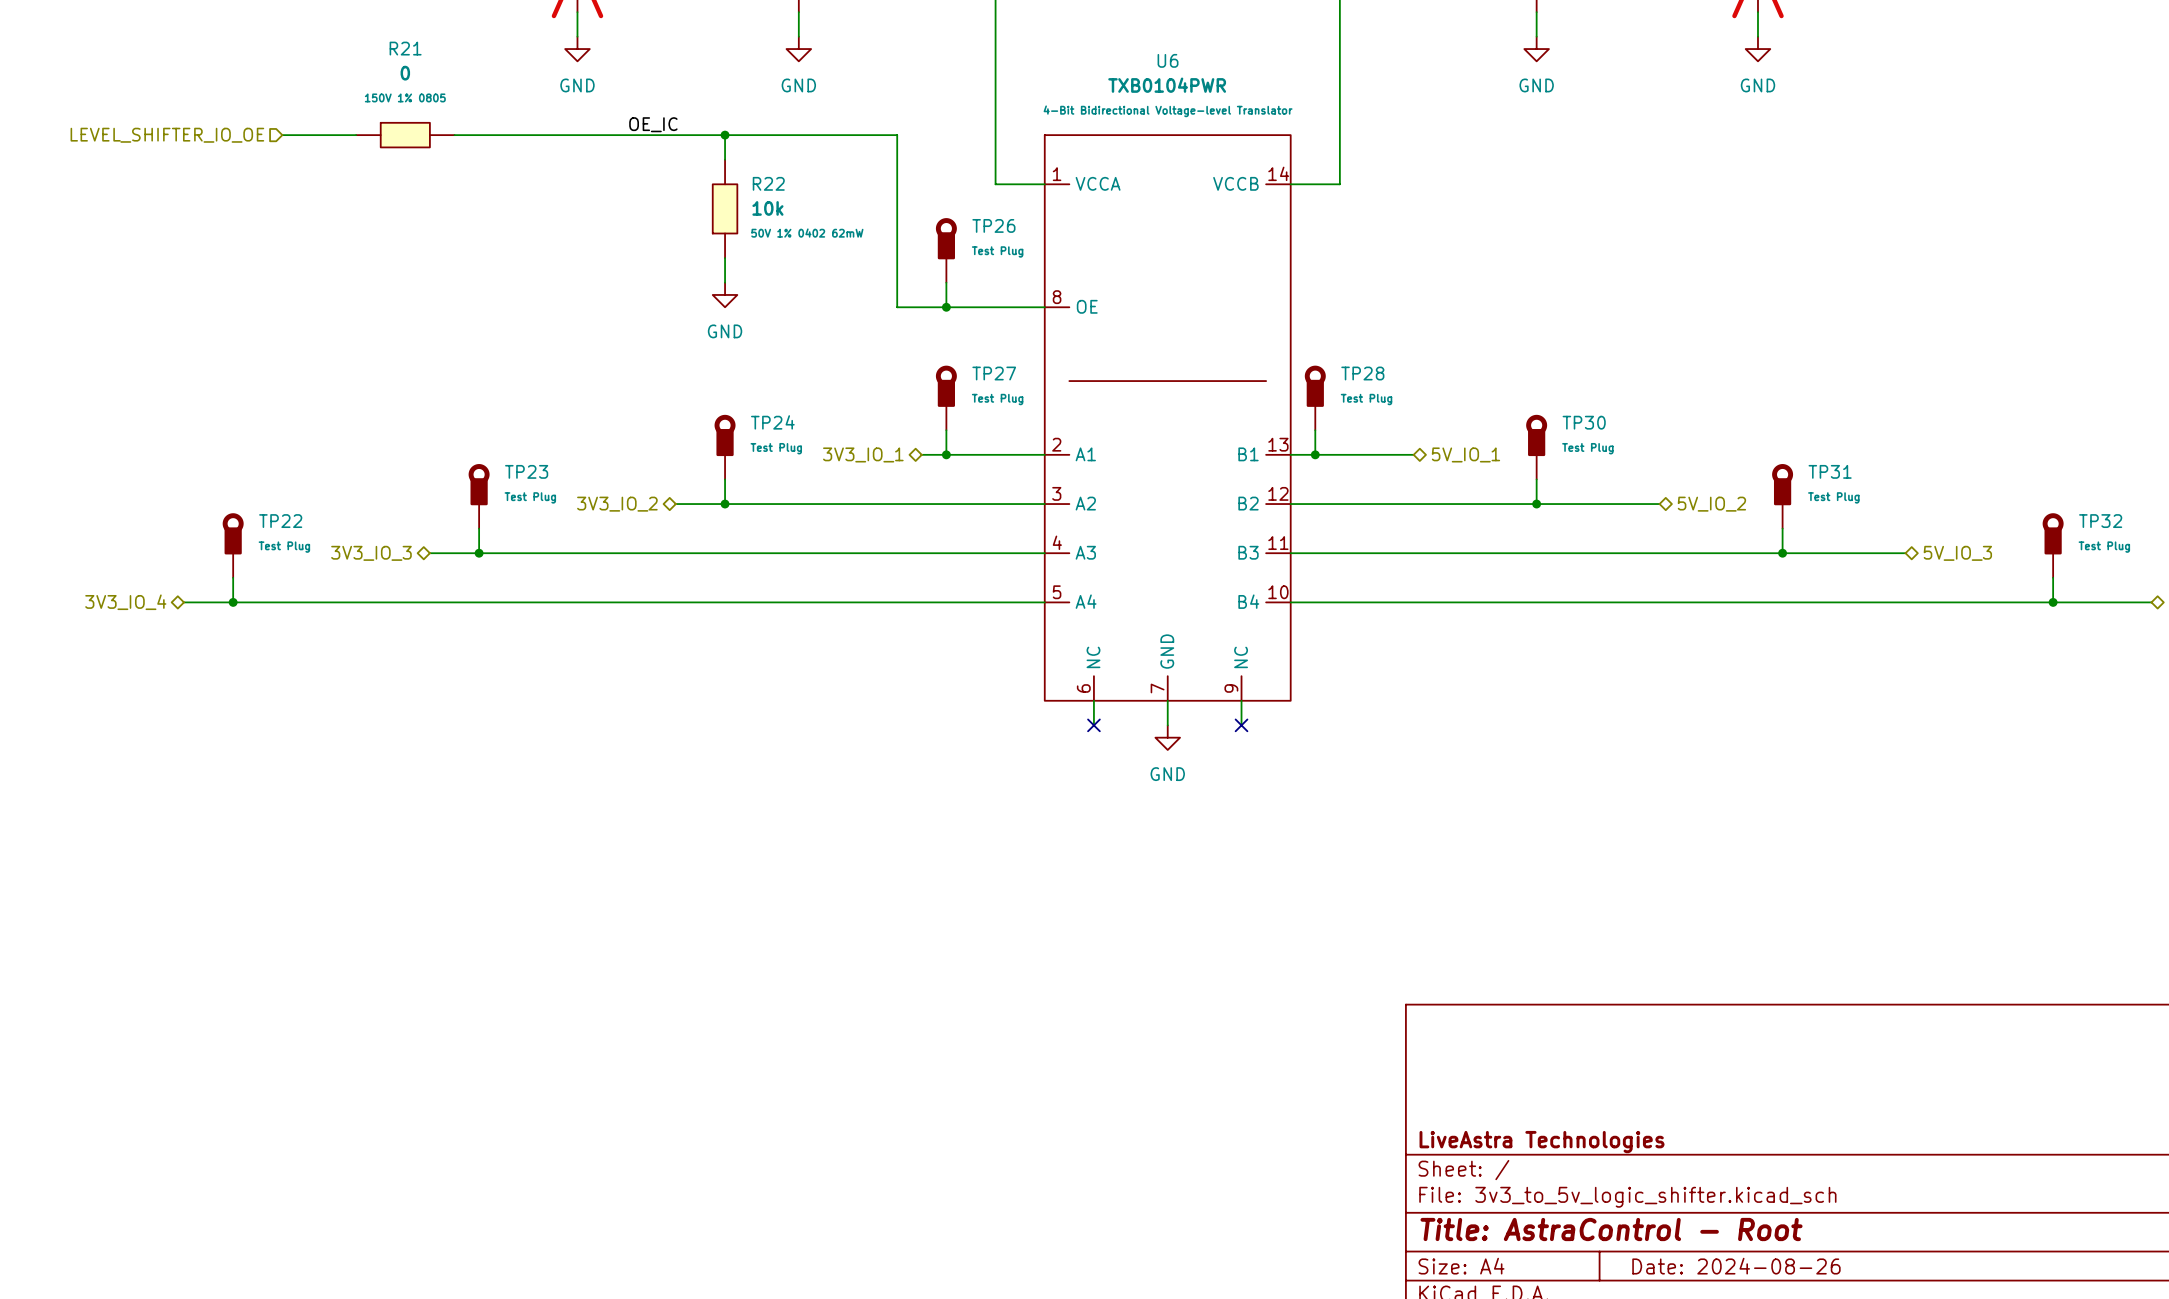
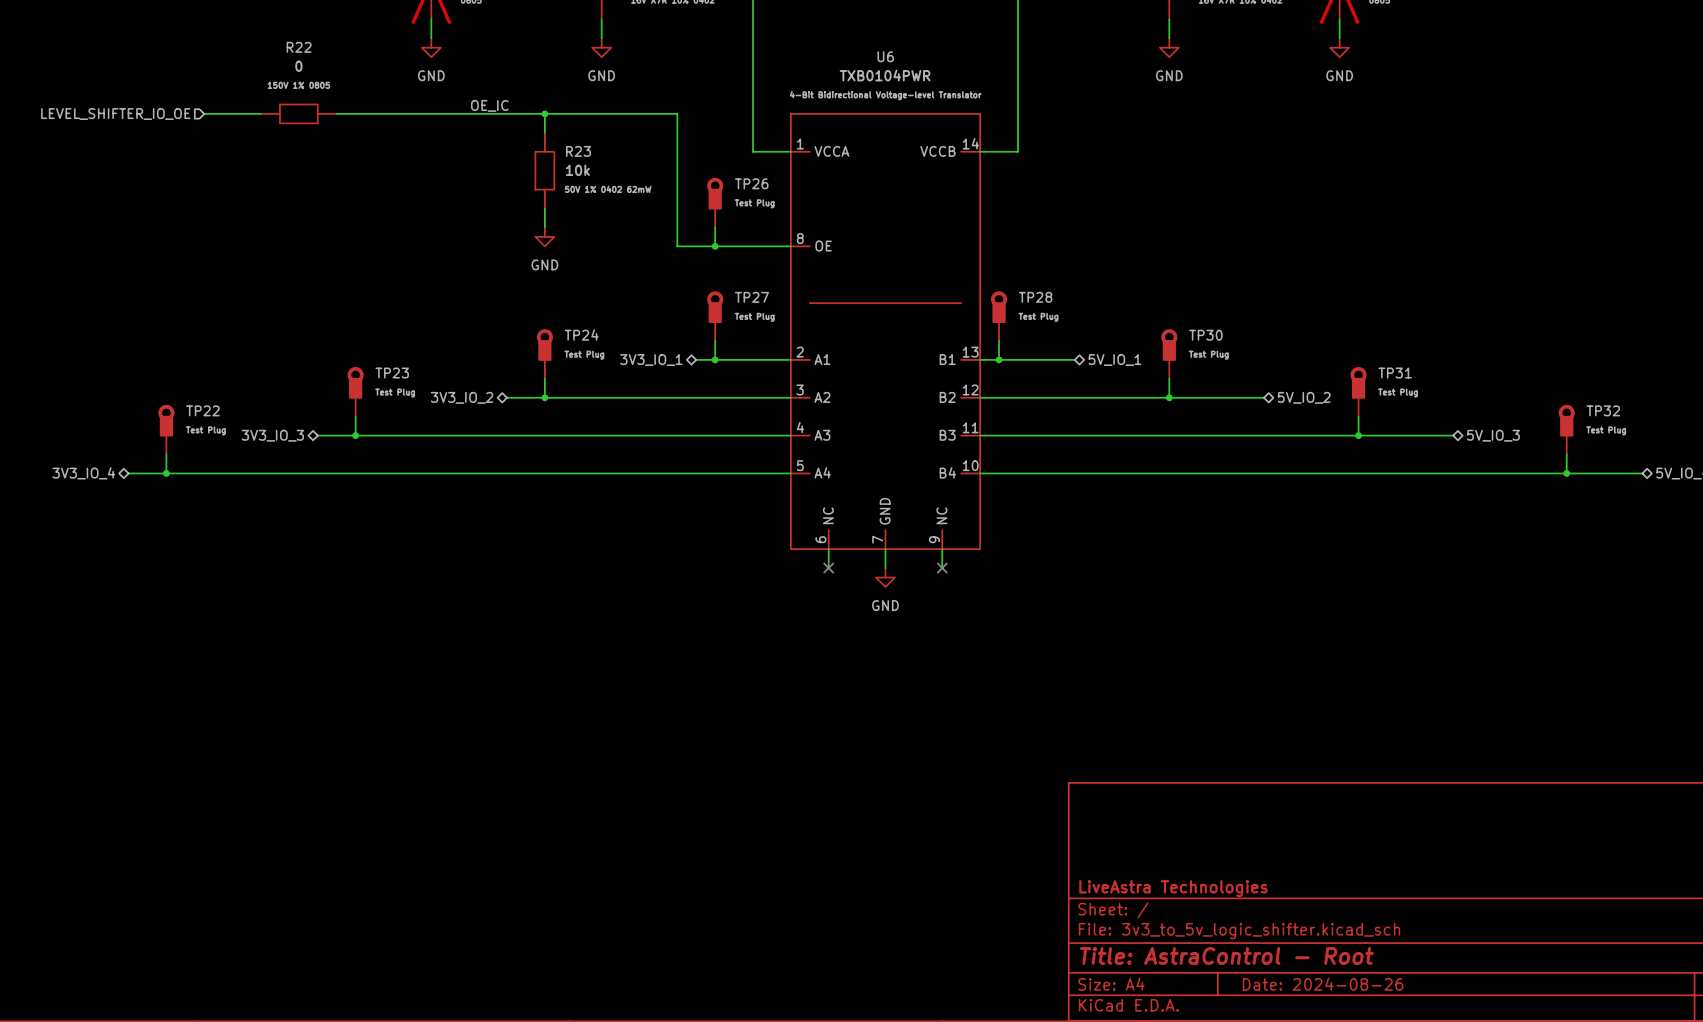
R21 name: R21 (405, 48) -> R22 (299, 47)
R22 name: R22 (768, 183) -> R23 (578, 151)

